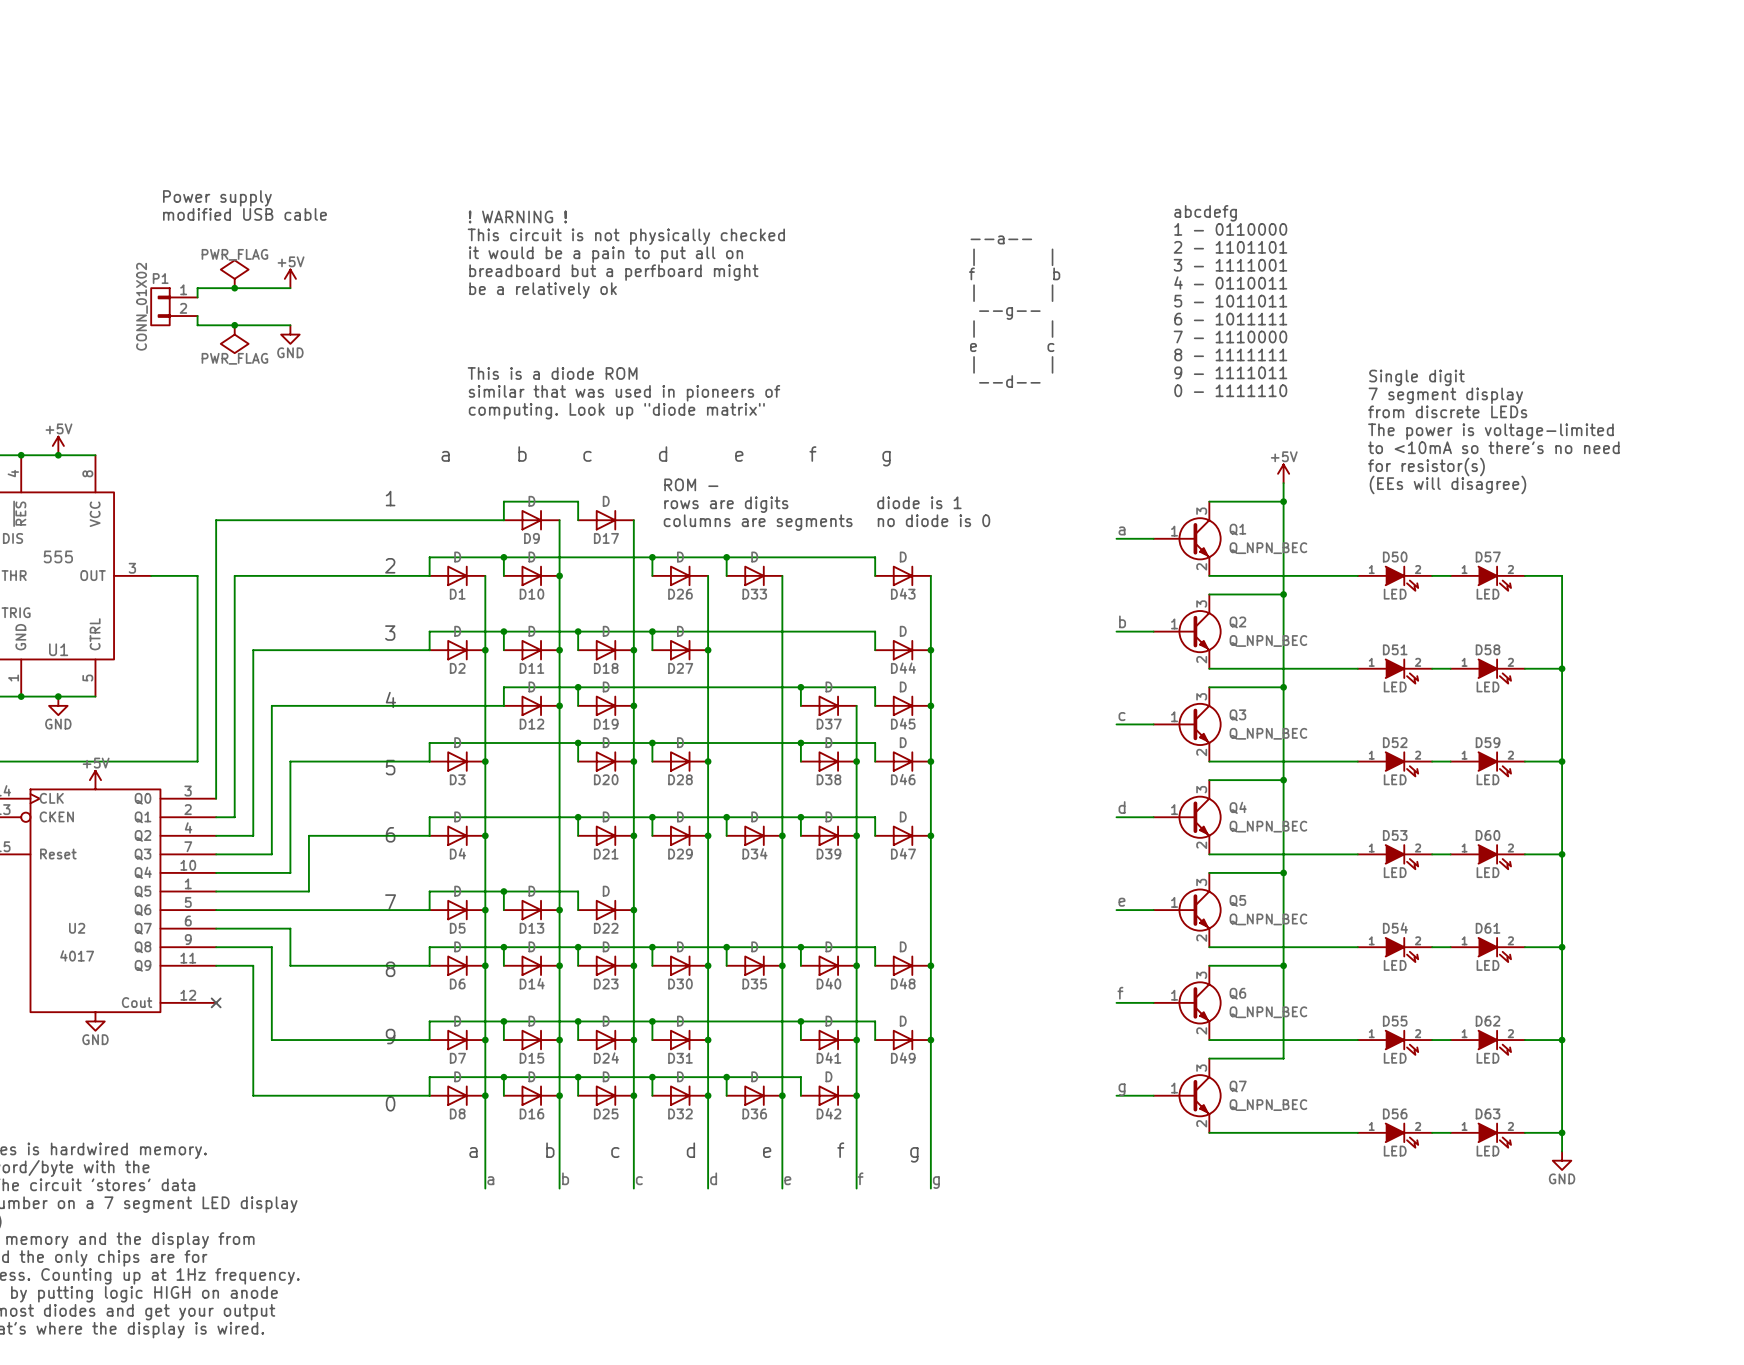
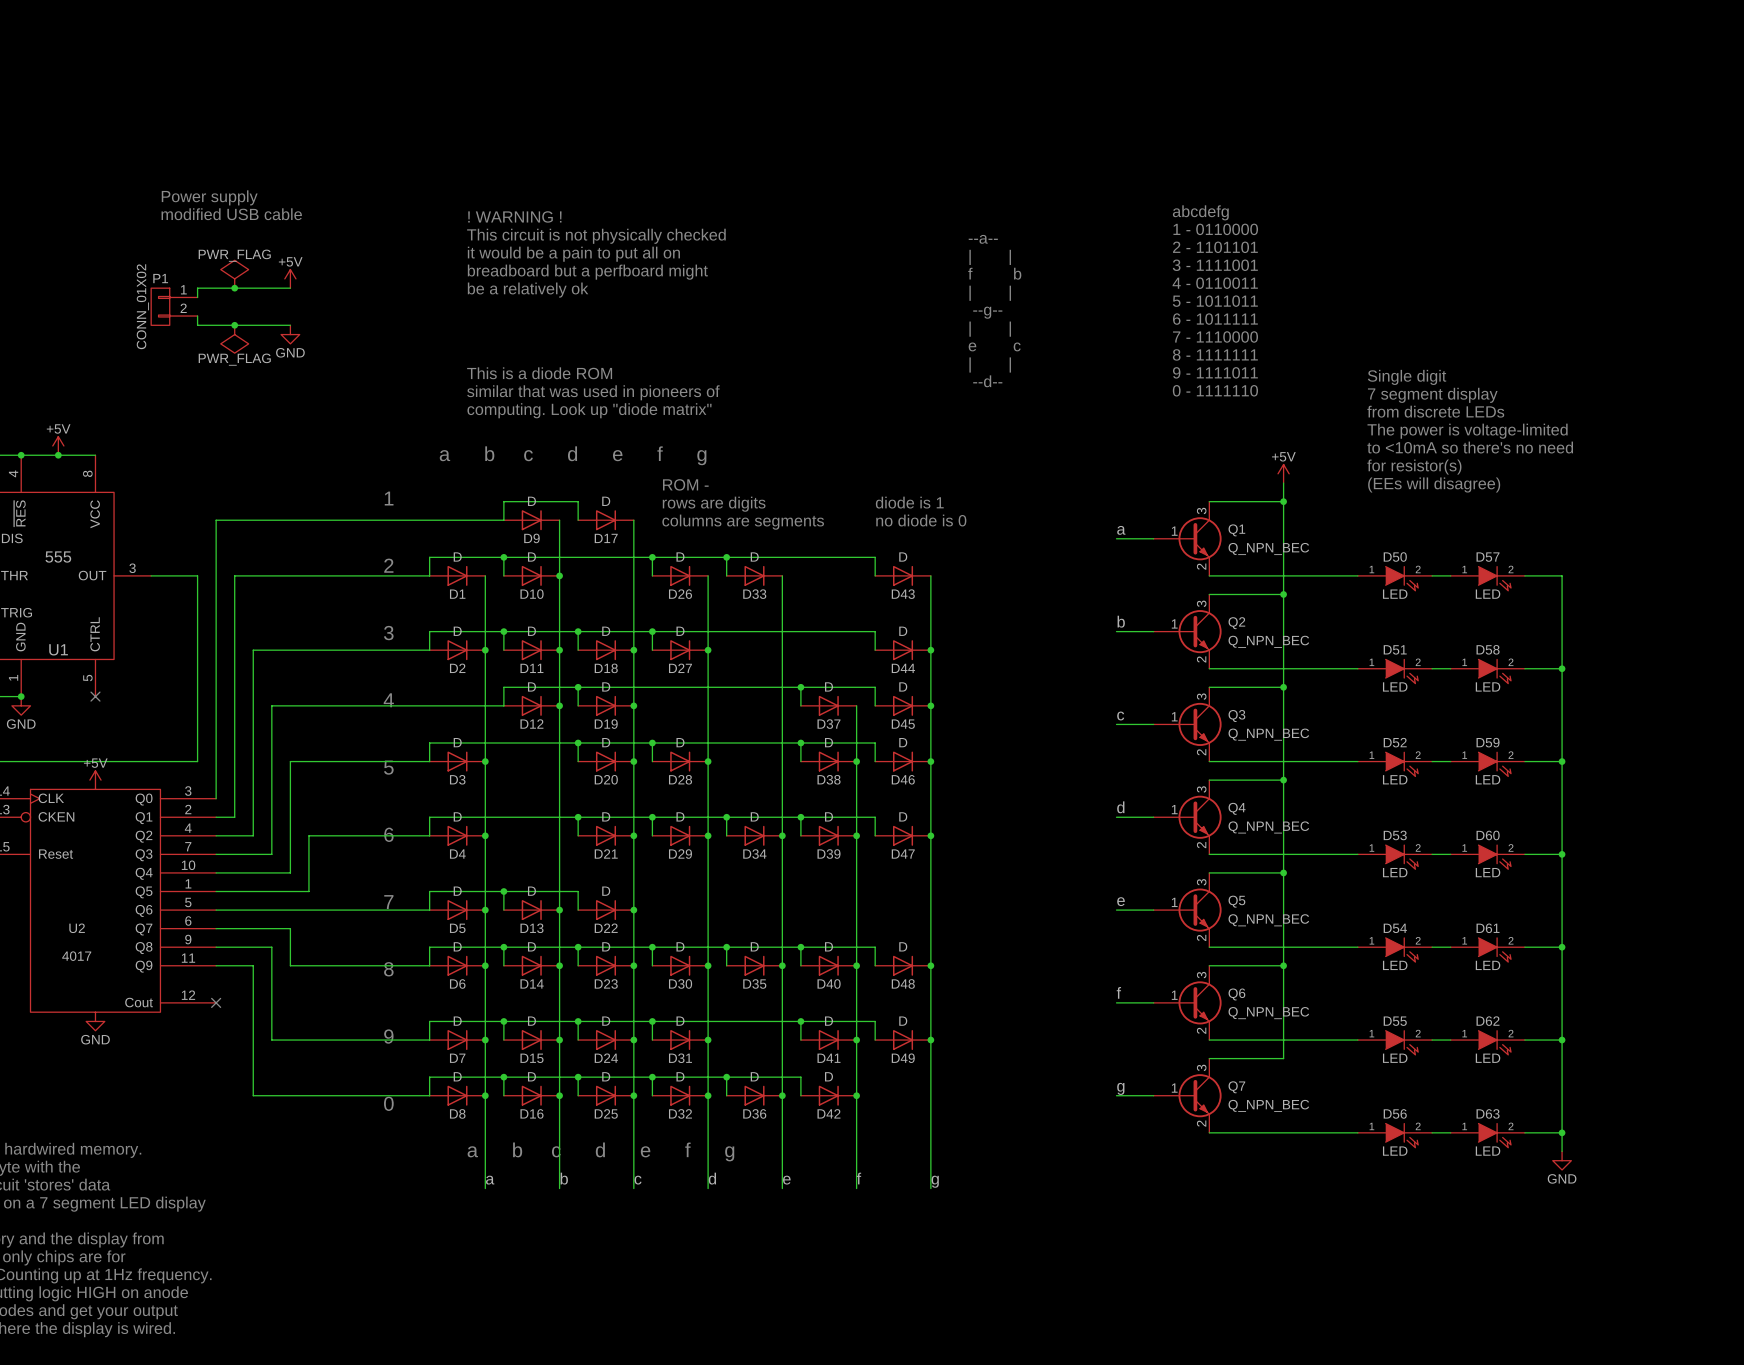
wire: (21, 696) (95, 696) -> none
junction: (58, 696) -> none
no-connect mark: none -> (95, 696)
power symbol position: GND (58, 705) -> GND (21, 705)

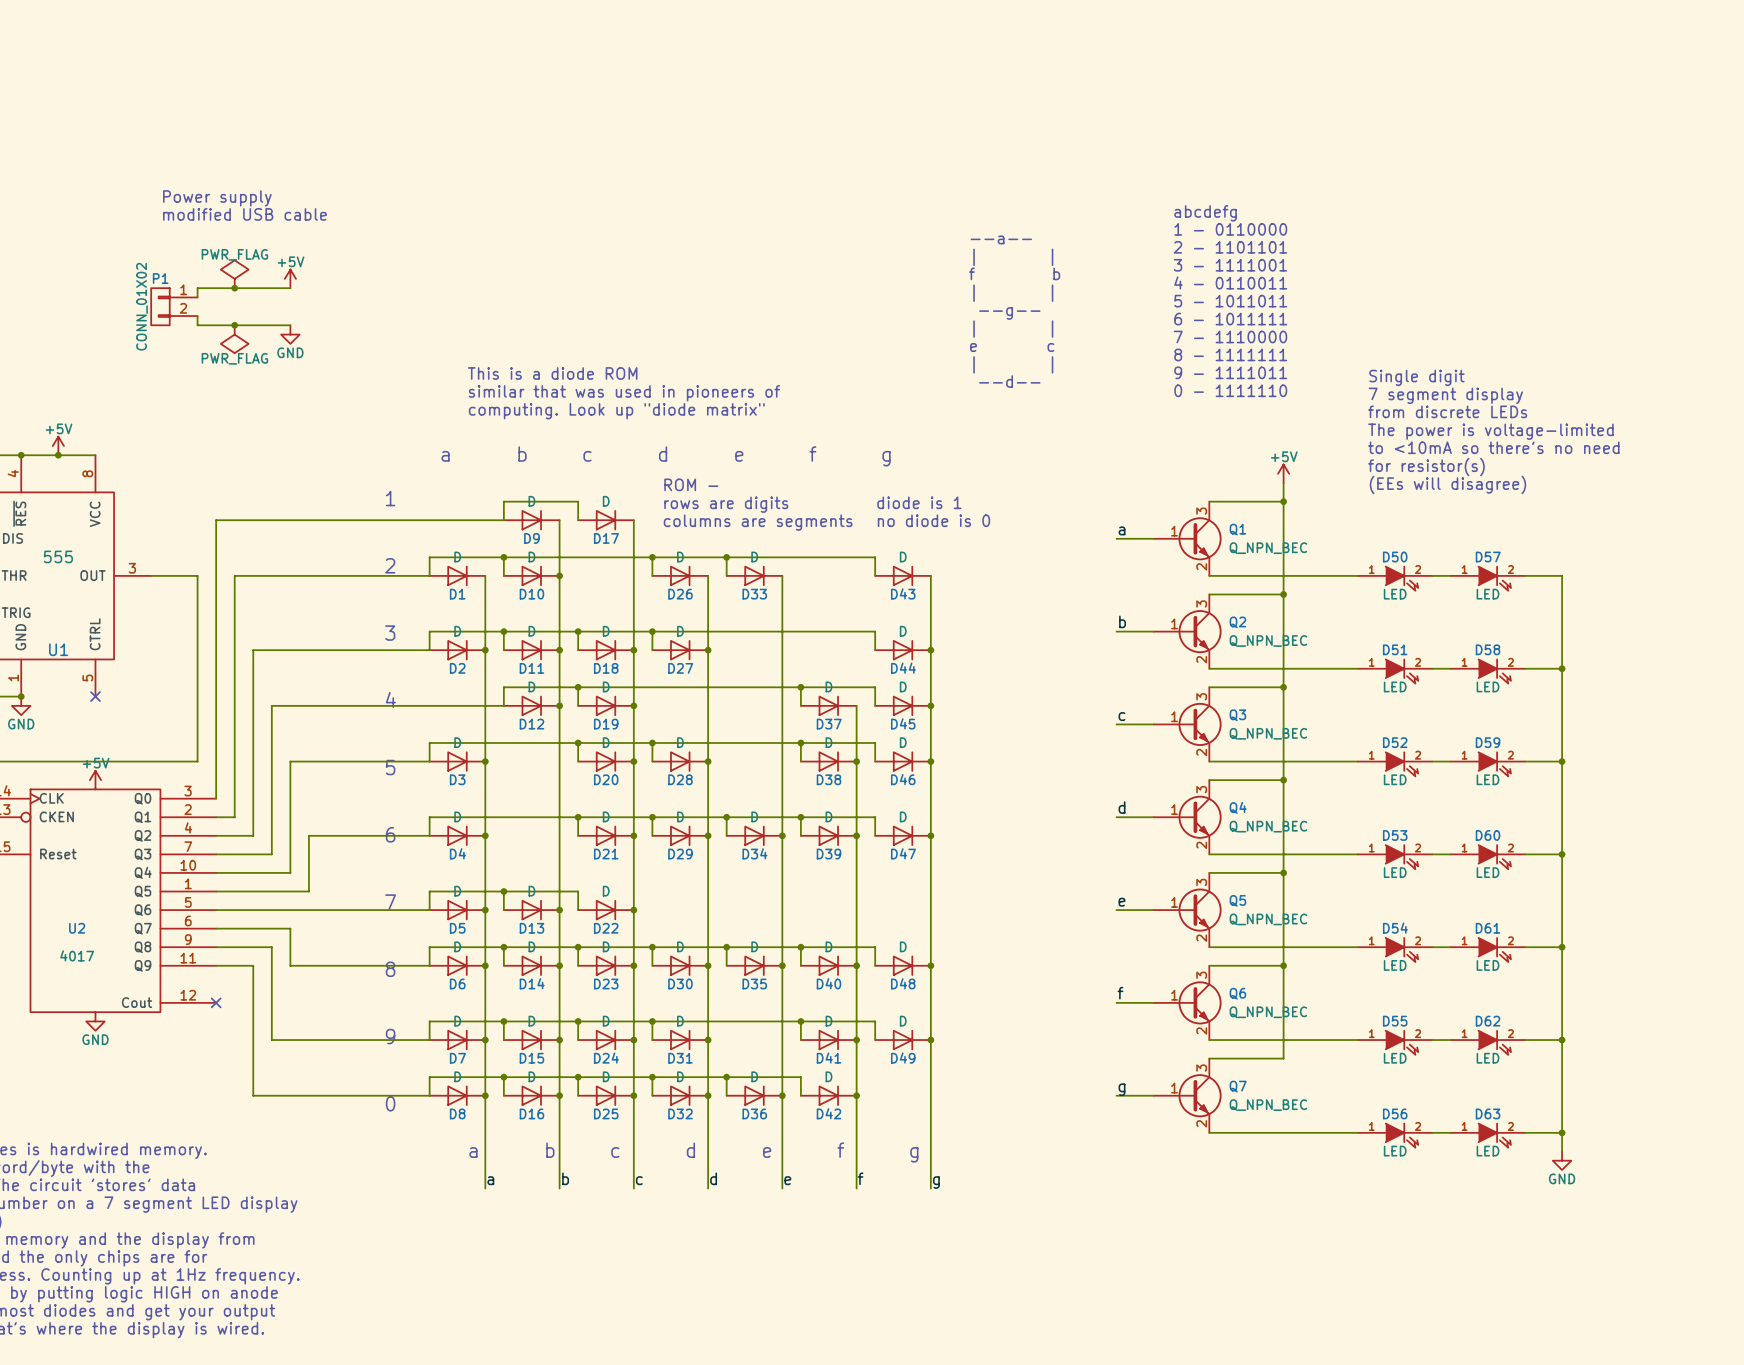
text: ! WARNING ! (514, 216) -> none
text: This circuit is not physically checked (596, 236) -> none
text: it would be a pain to put all on (573, 254) -> none
text: breadboard but a perfboard might (587, 272) -> none
text: be a relatively ok (528, 290) -> none

